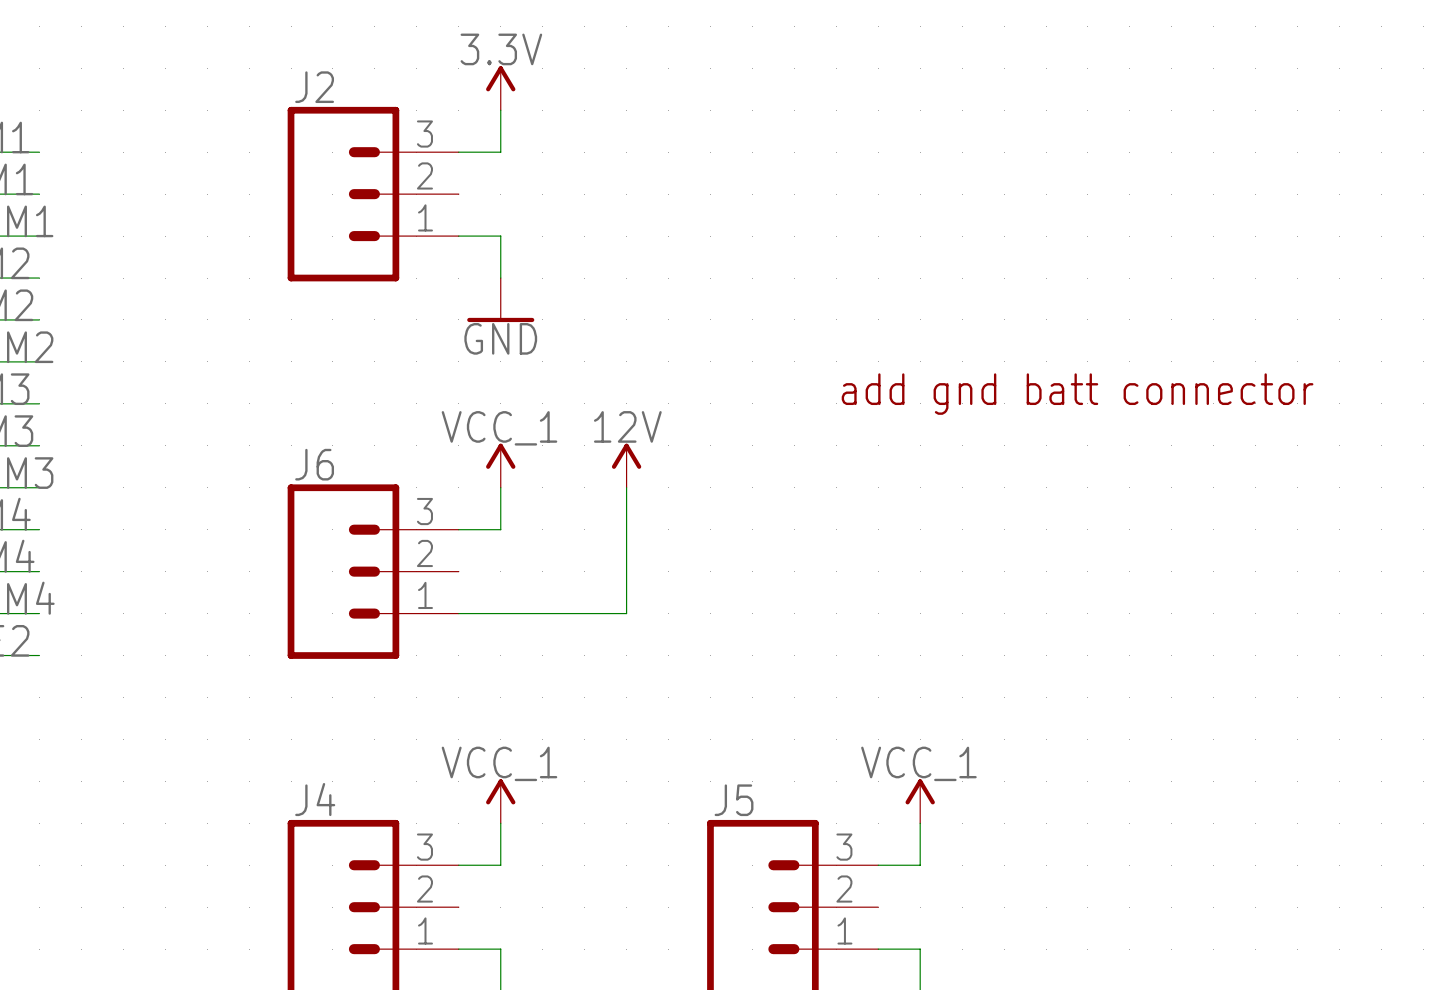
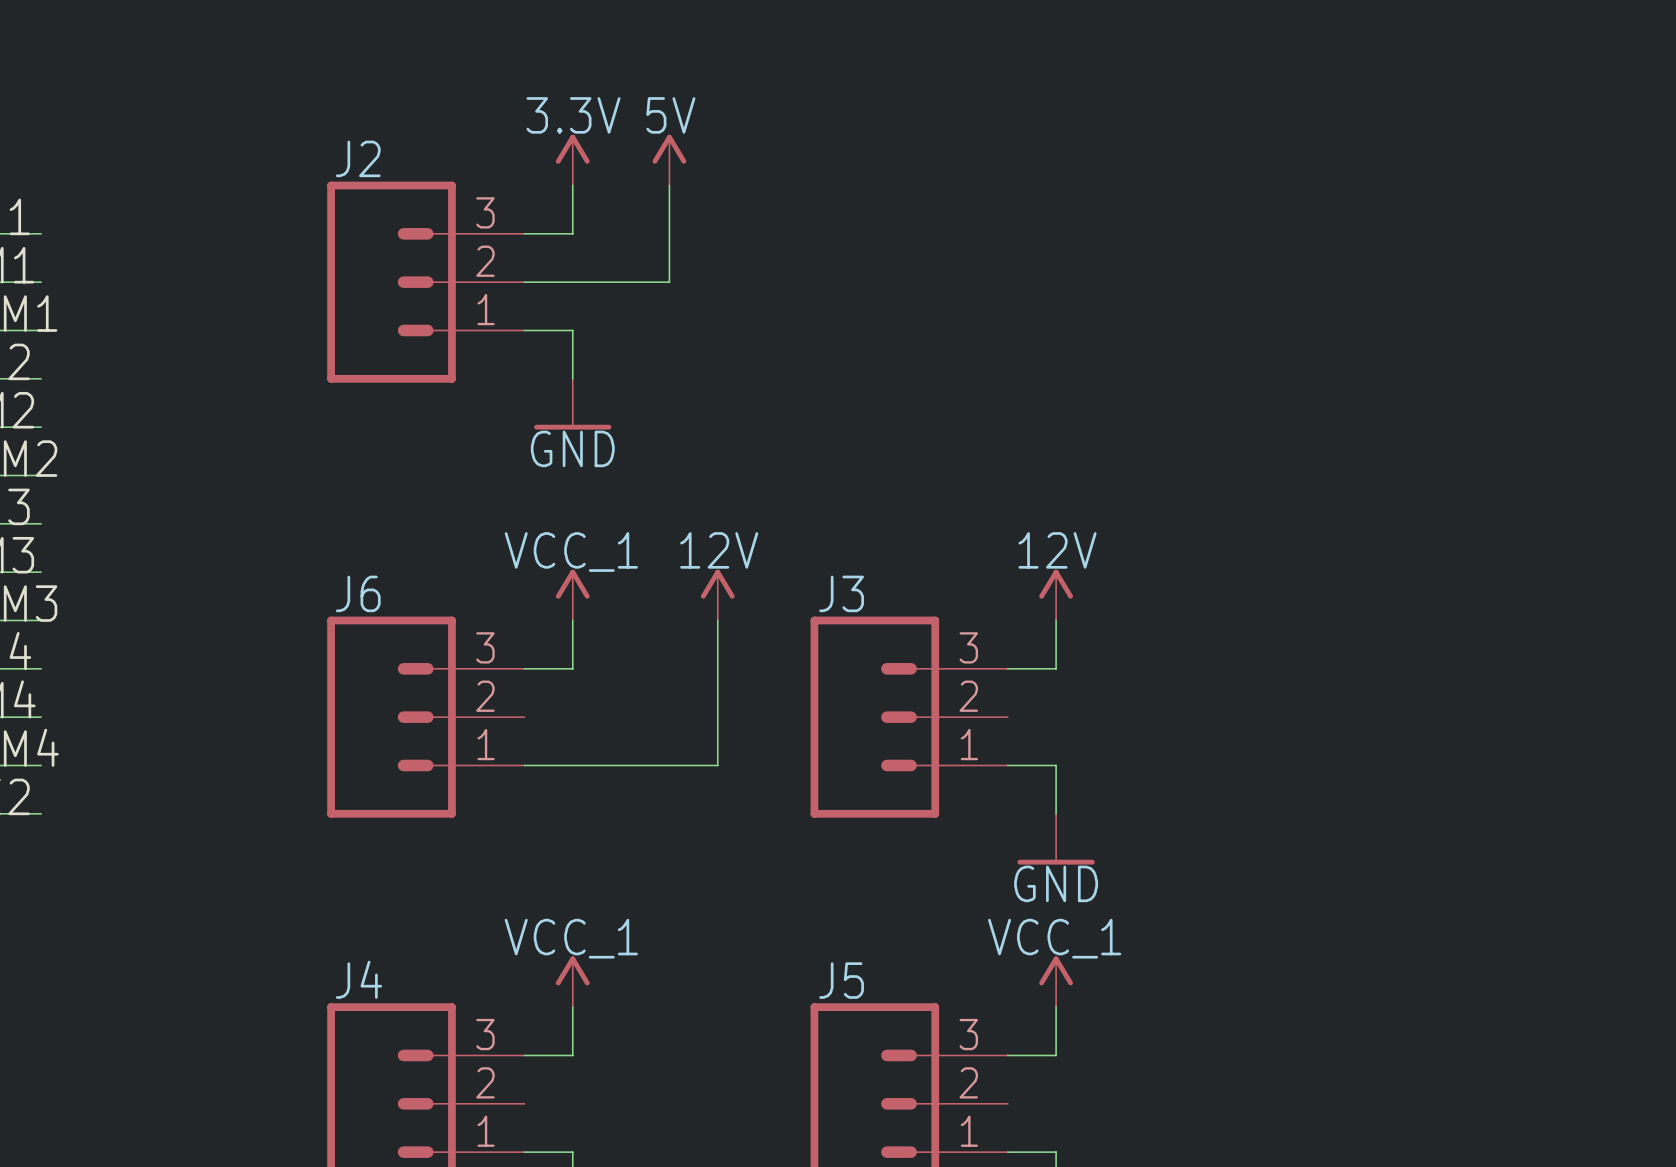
power symbol: none -> 5V (669, 160)
wire: none -> (669, 185) (669, 282) (524, 282)
text: add gnd batt connector (1077, 394) -> none
power symbol: none -> 12V (1056, 595)
wire: none -> (1056, 620) (1056, 668) (1007, 668)
J3: none -> (909, 717)
wire: none -> (1007, 765) (1056, 765) (1056, 813)
power symbol: none -> GND (1056, 839)

